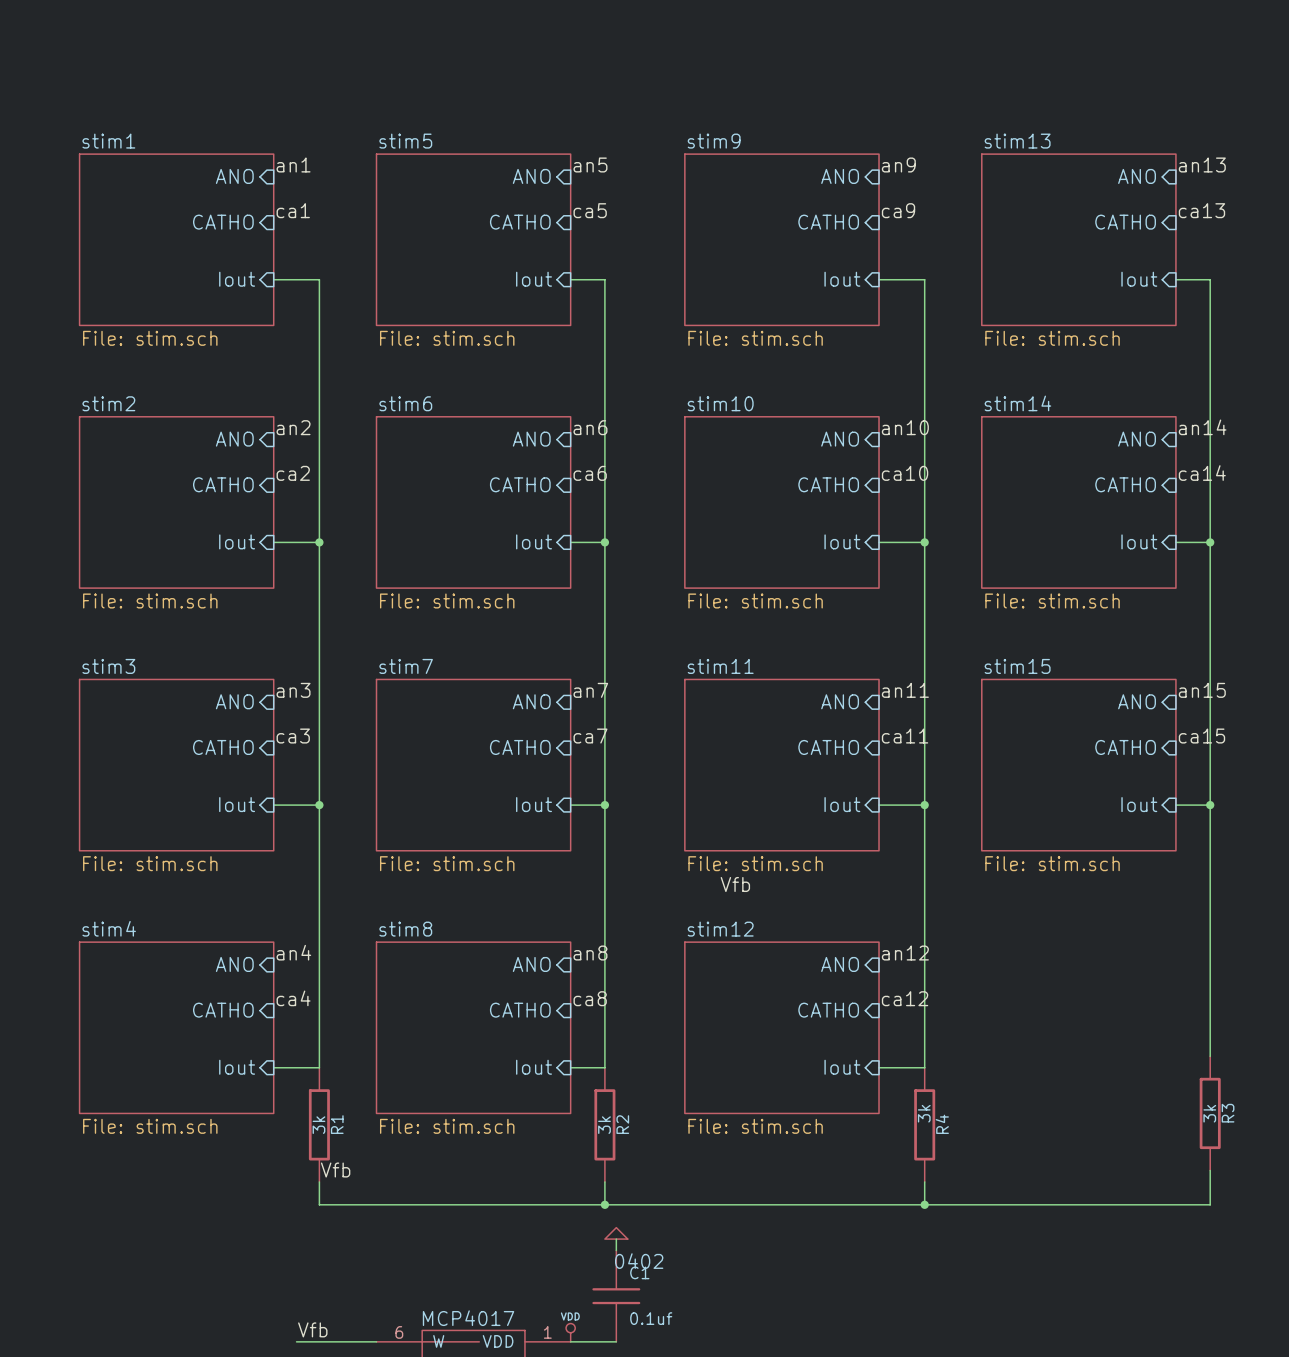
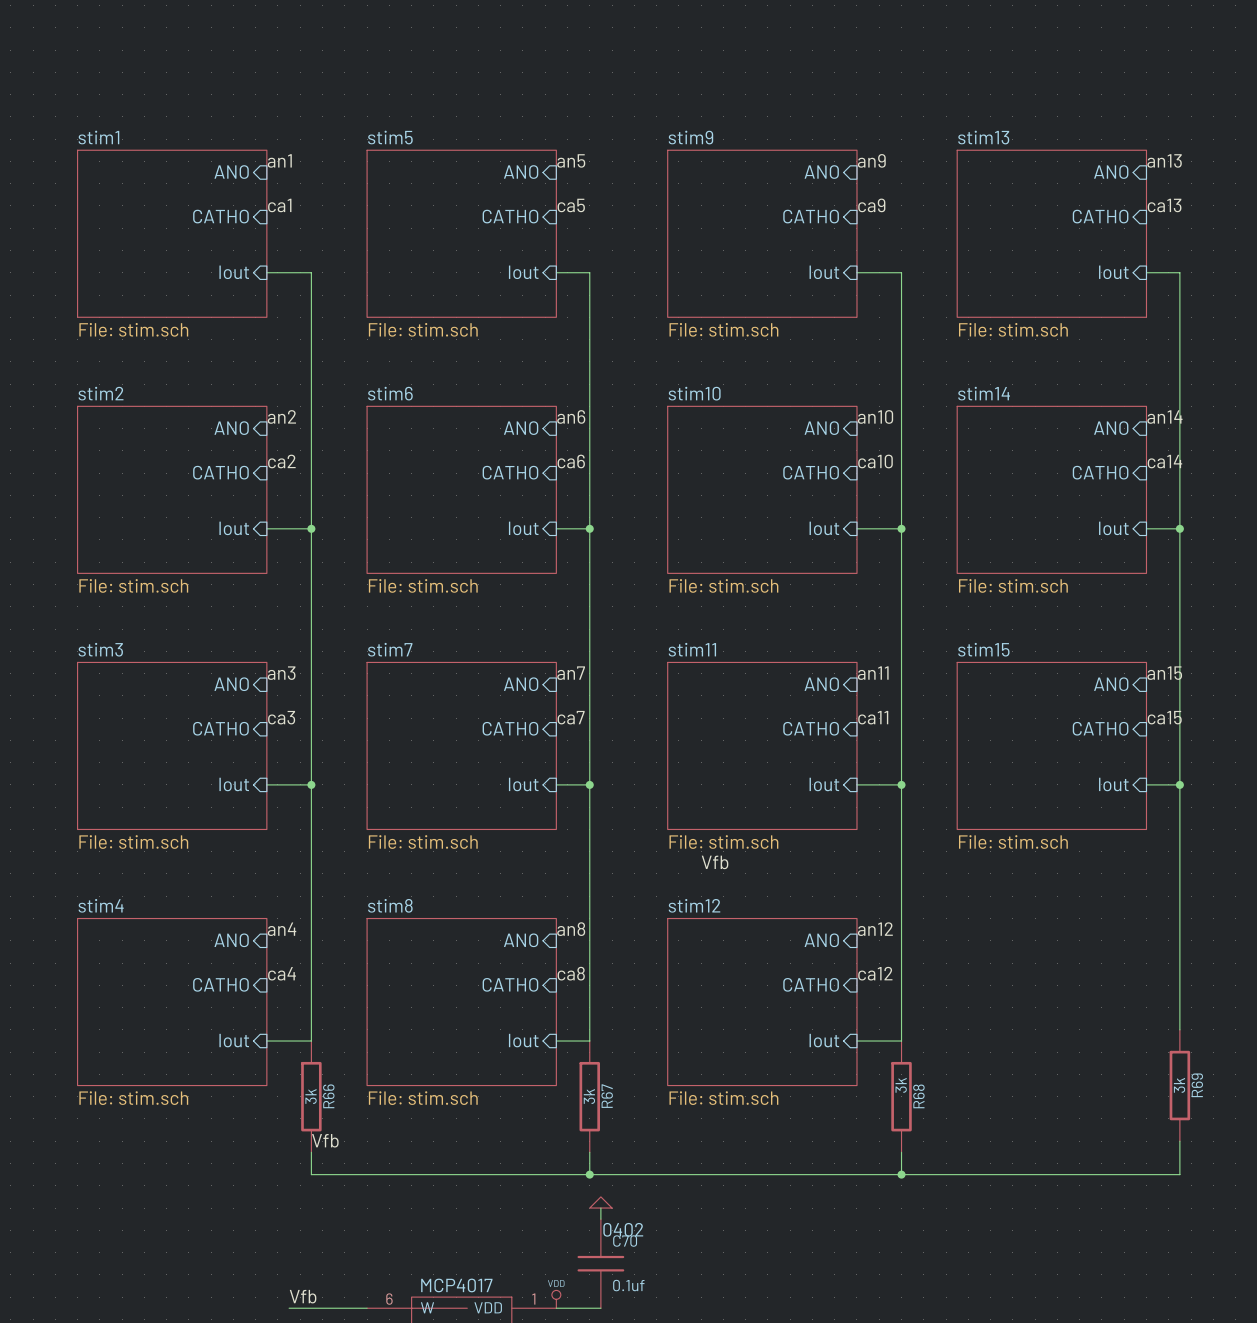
R3 name: R3 (1228, 1113) -> R69 (1197, 1085)
R1 name: R1 (337, 1124) -> R66 (328, 1096)
R2 name: R2 (622, 1124) -> R67 (607, 1096)
R4 name: R4 (942, 1124) -> R68 (918, 1096)
C1 name: C1 (639, 1272) -> C70 (625, 1241)

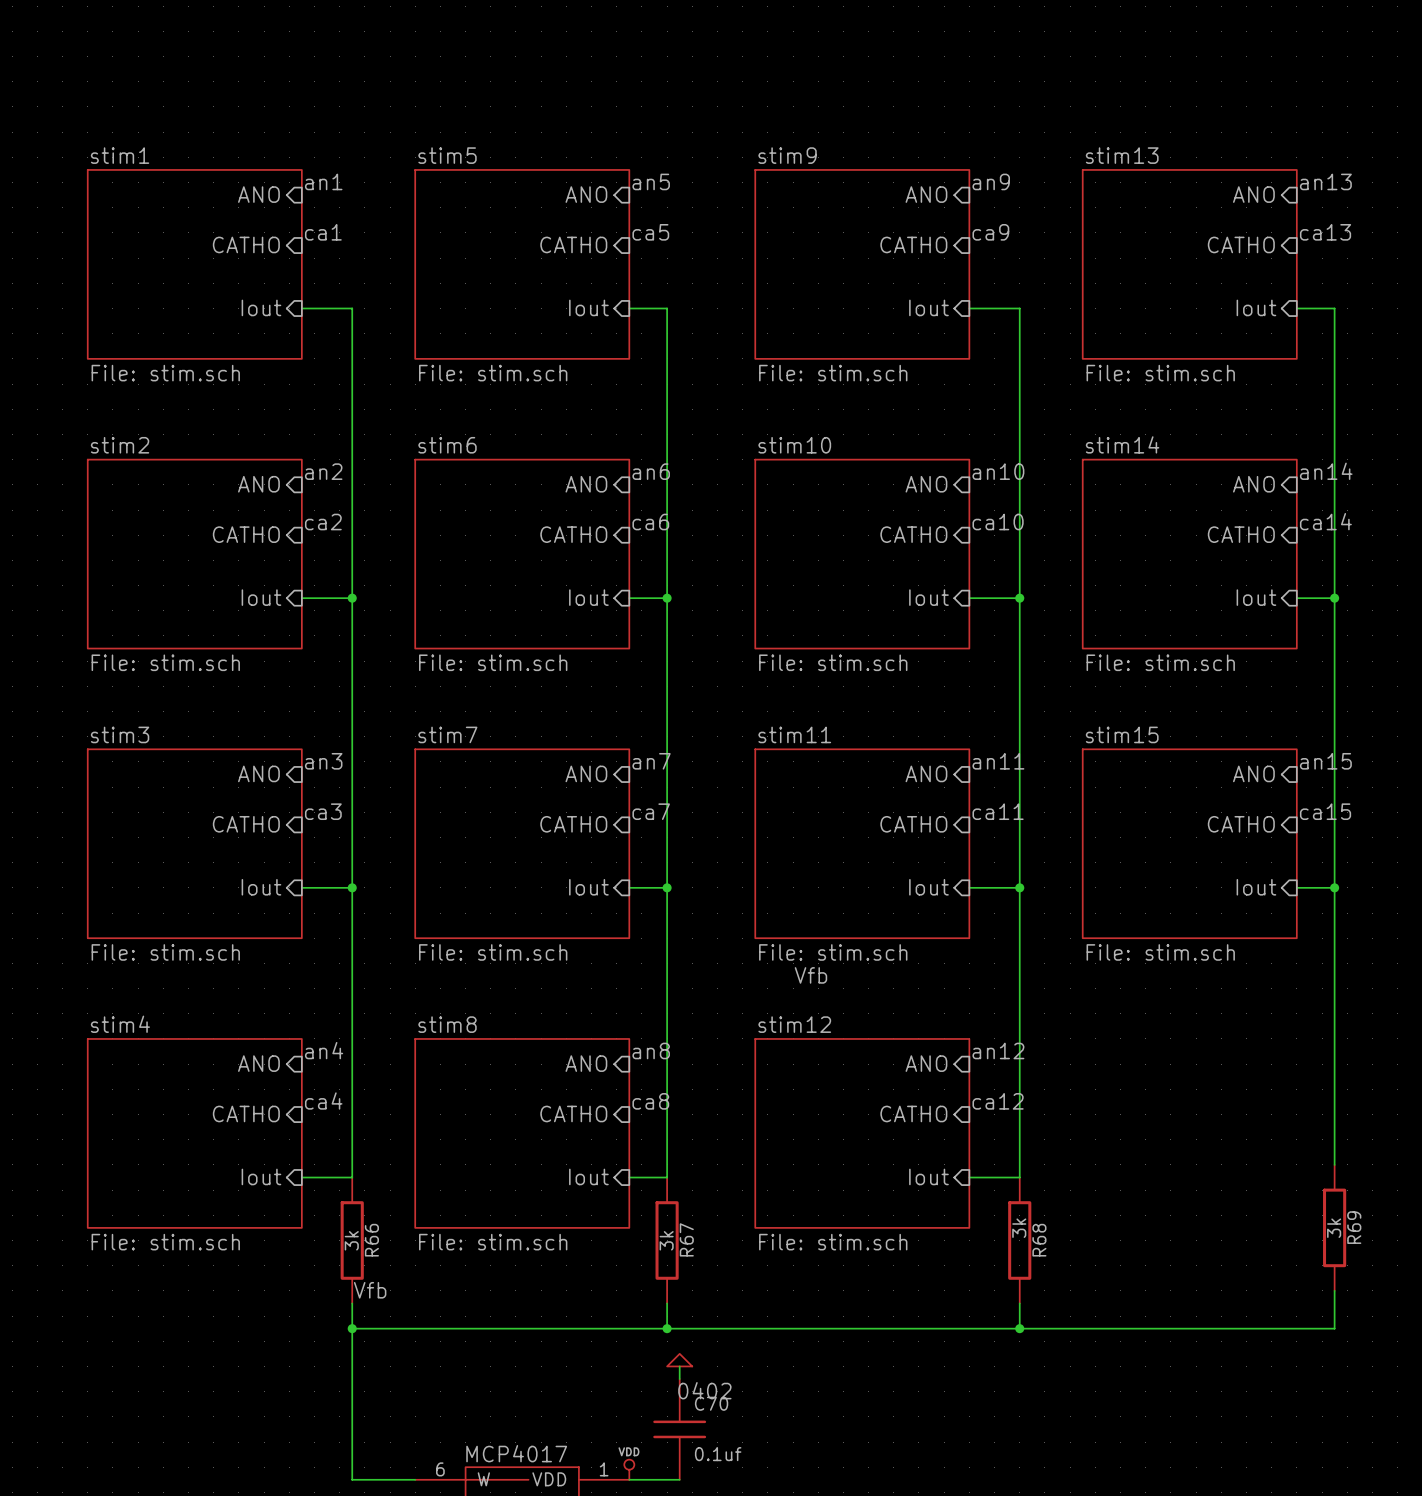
junction: none -> (352, 1328)
label: Vfb (303, 1296) -> none
wire: (289, 1308) (311, 1308) -> (352, 1328) (352, 1479)

